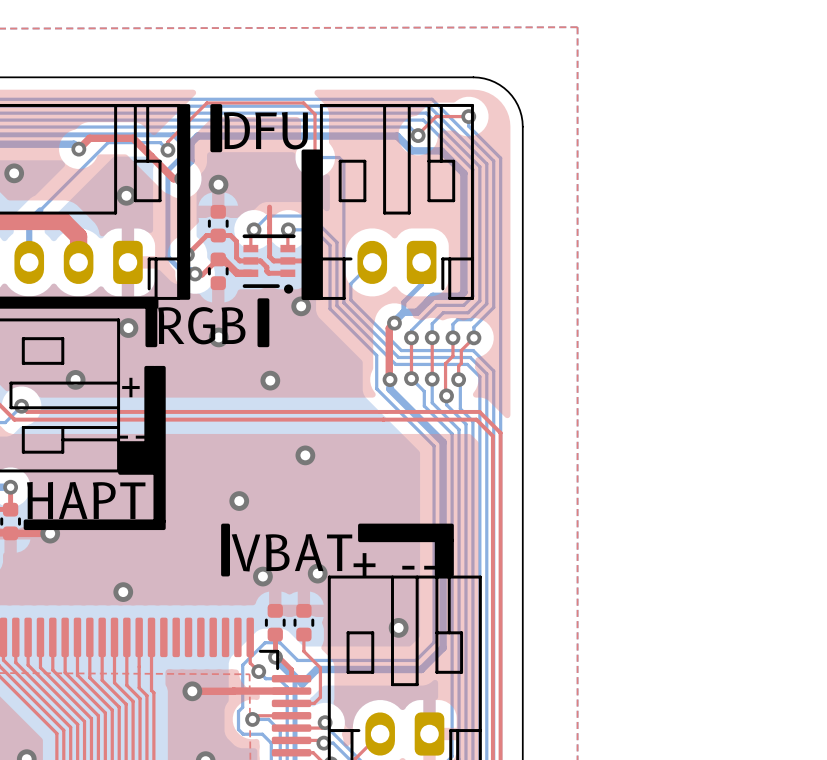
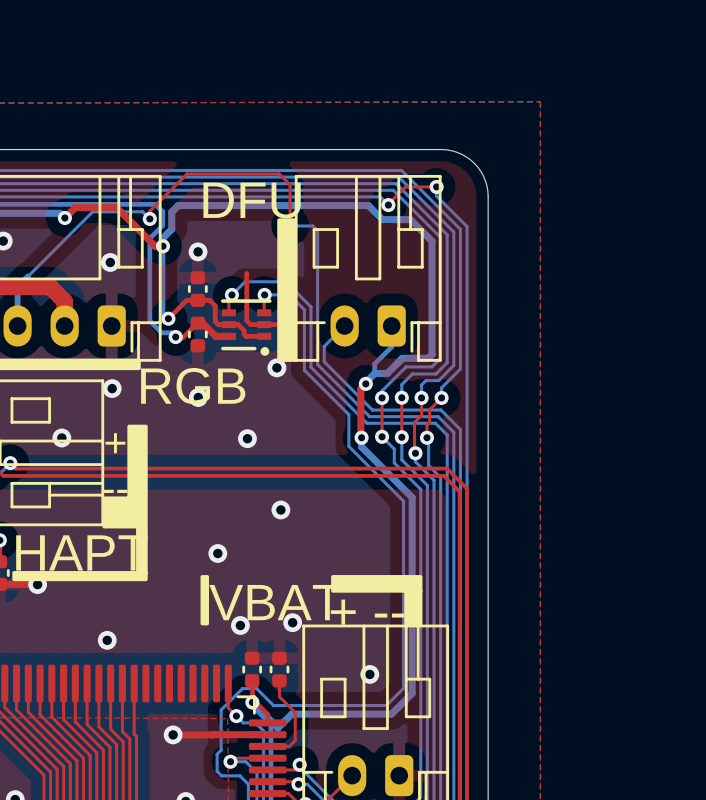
drawing: [145, 104, 223, 348] -> none
drawing: [257, 298, 270, 348] -> none

